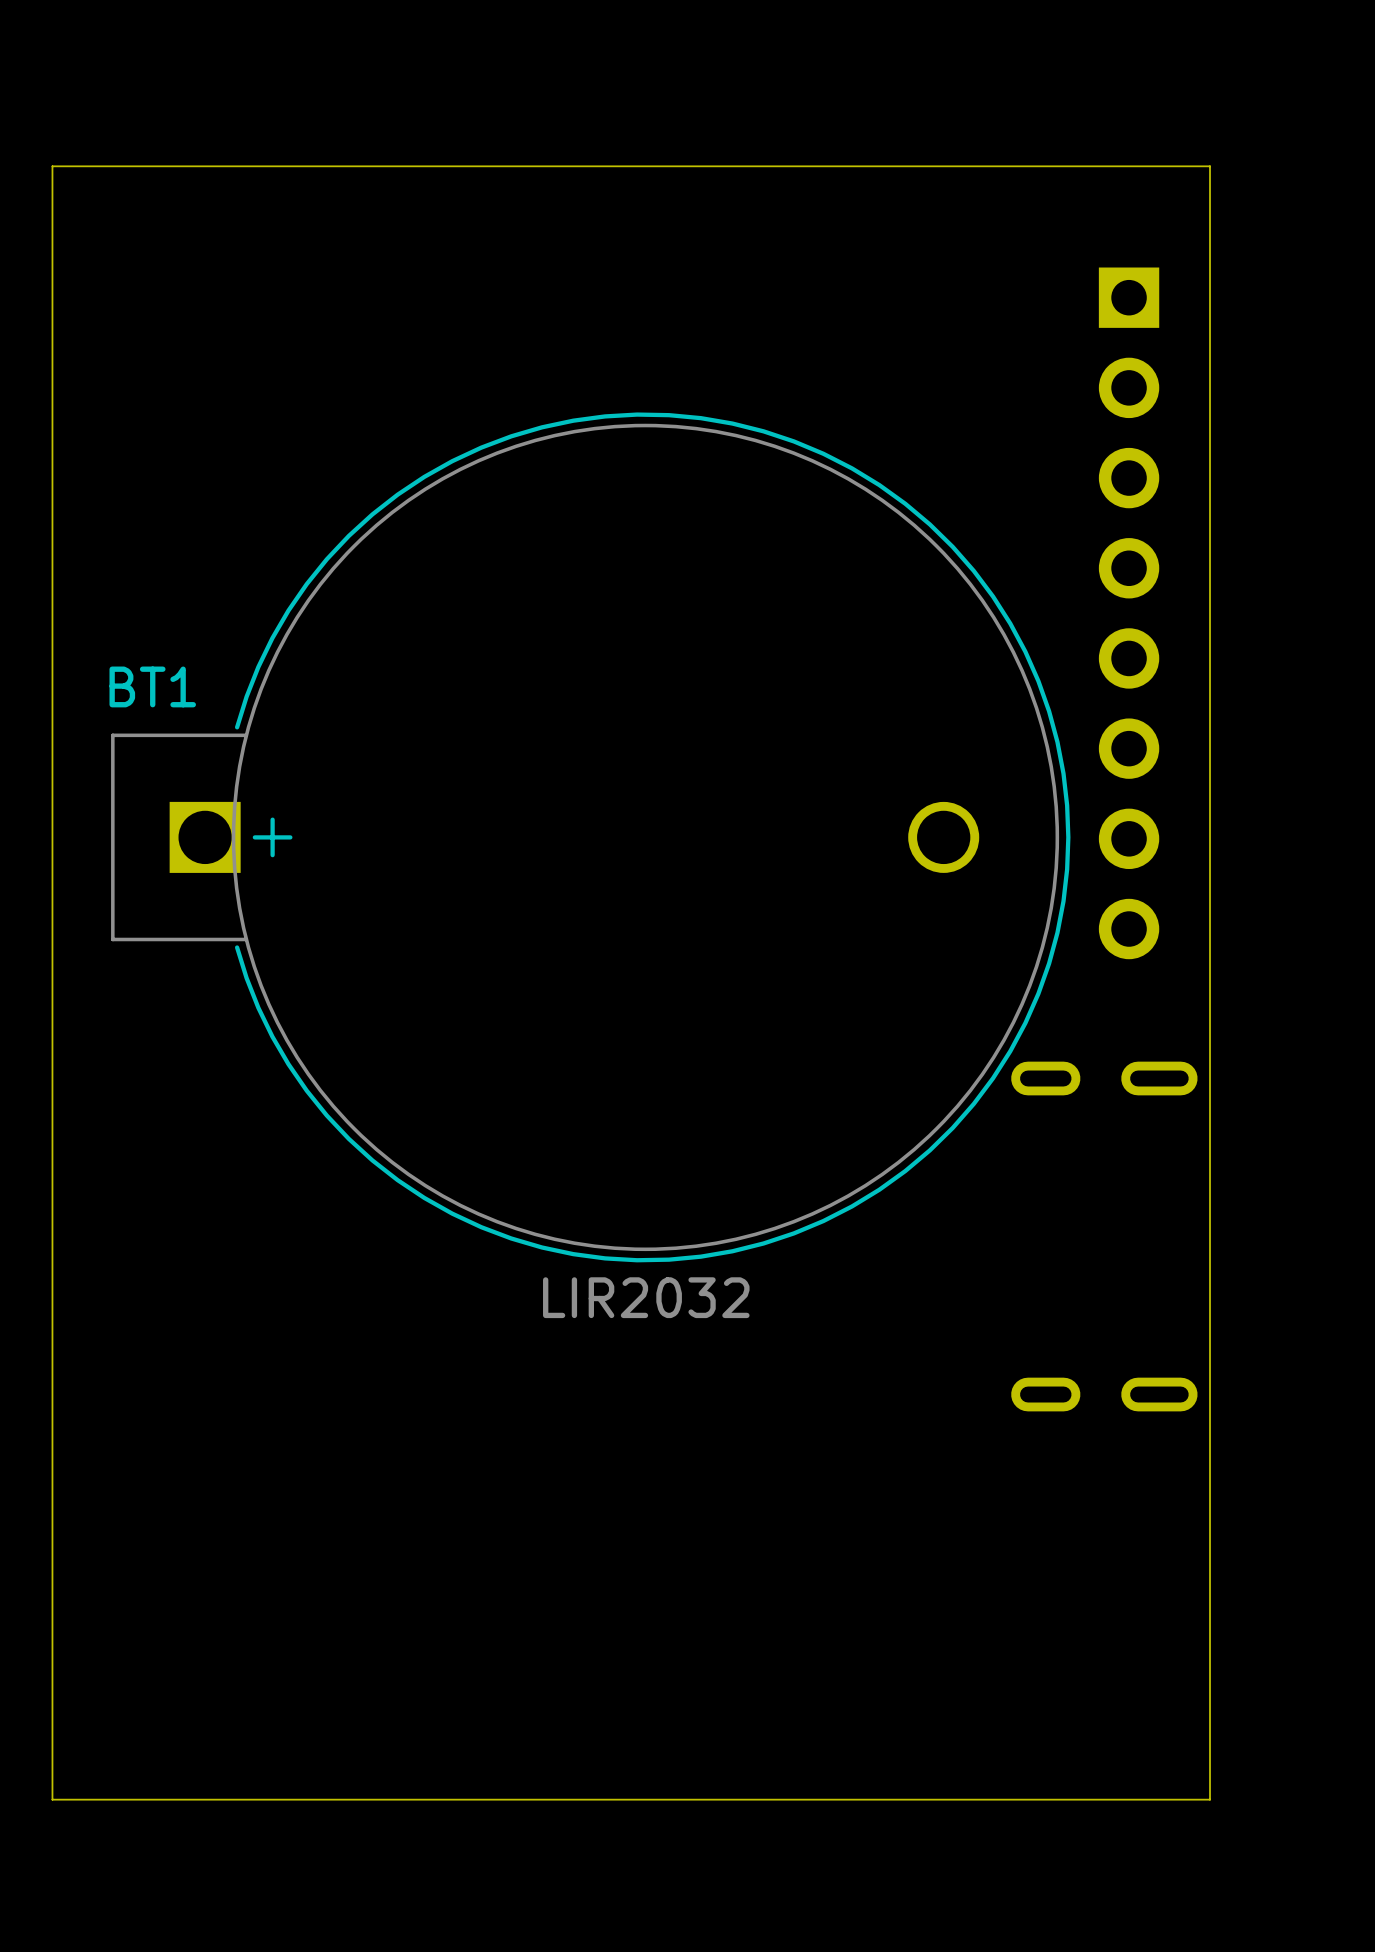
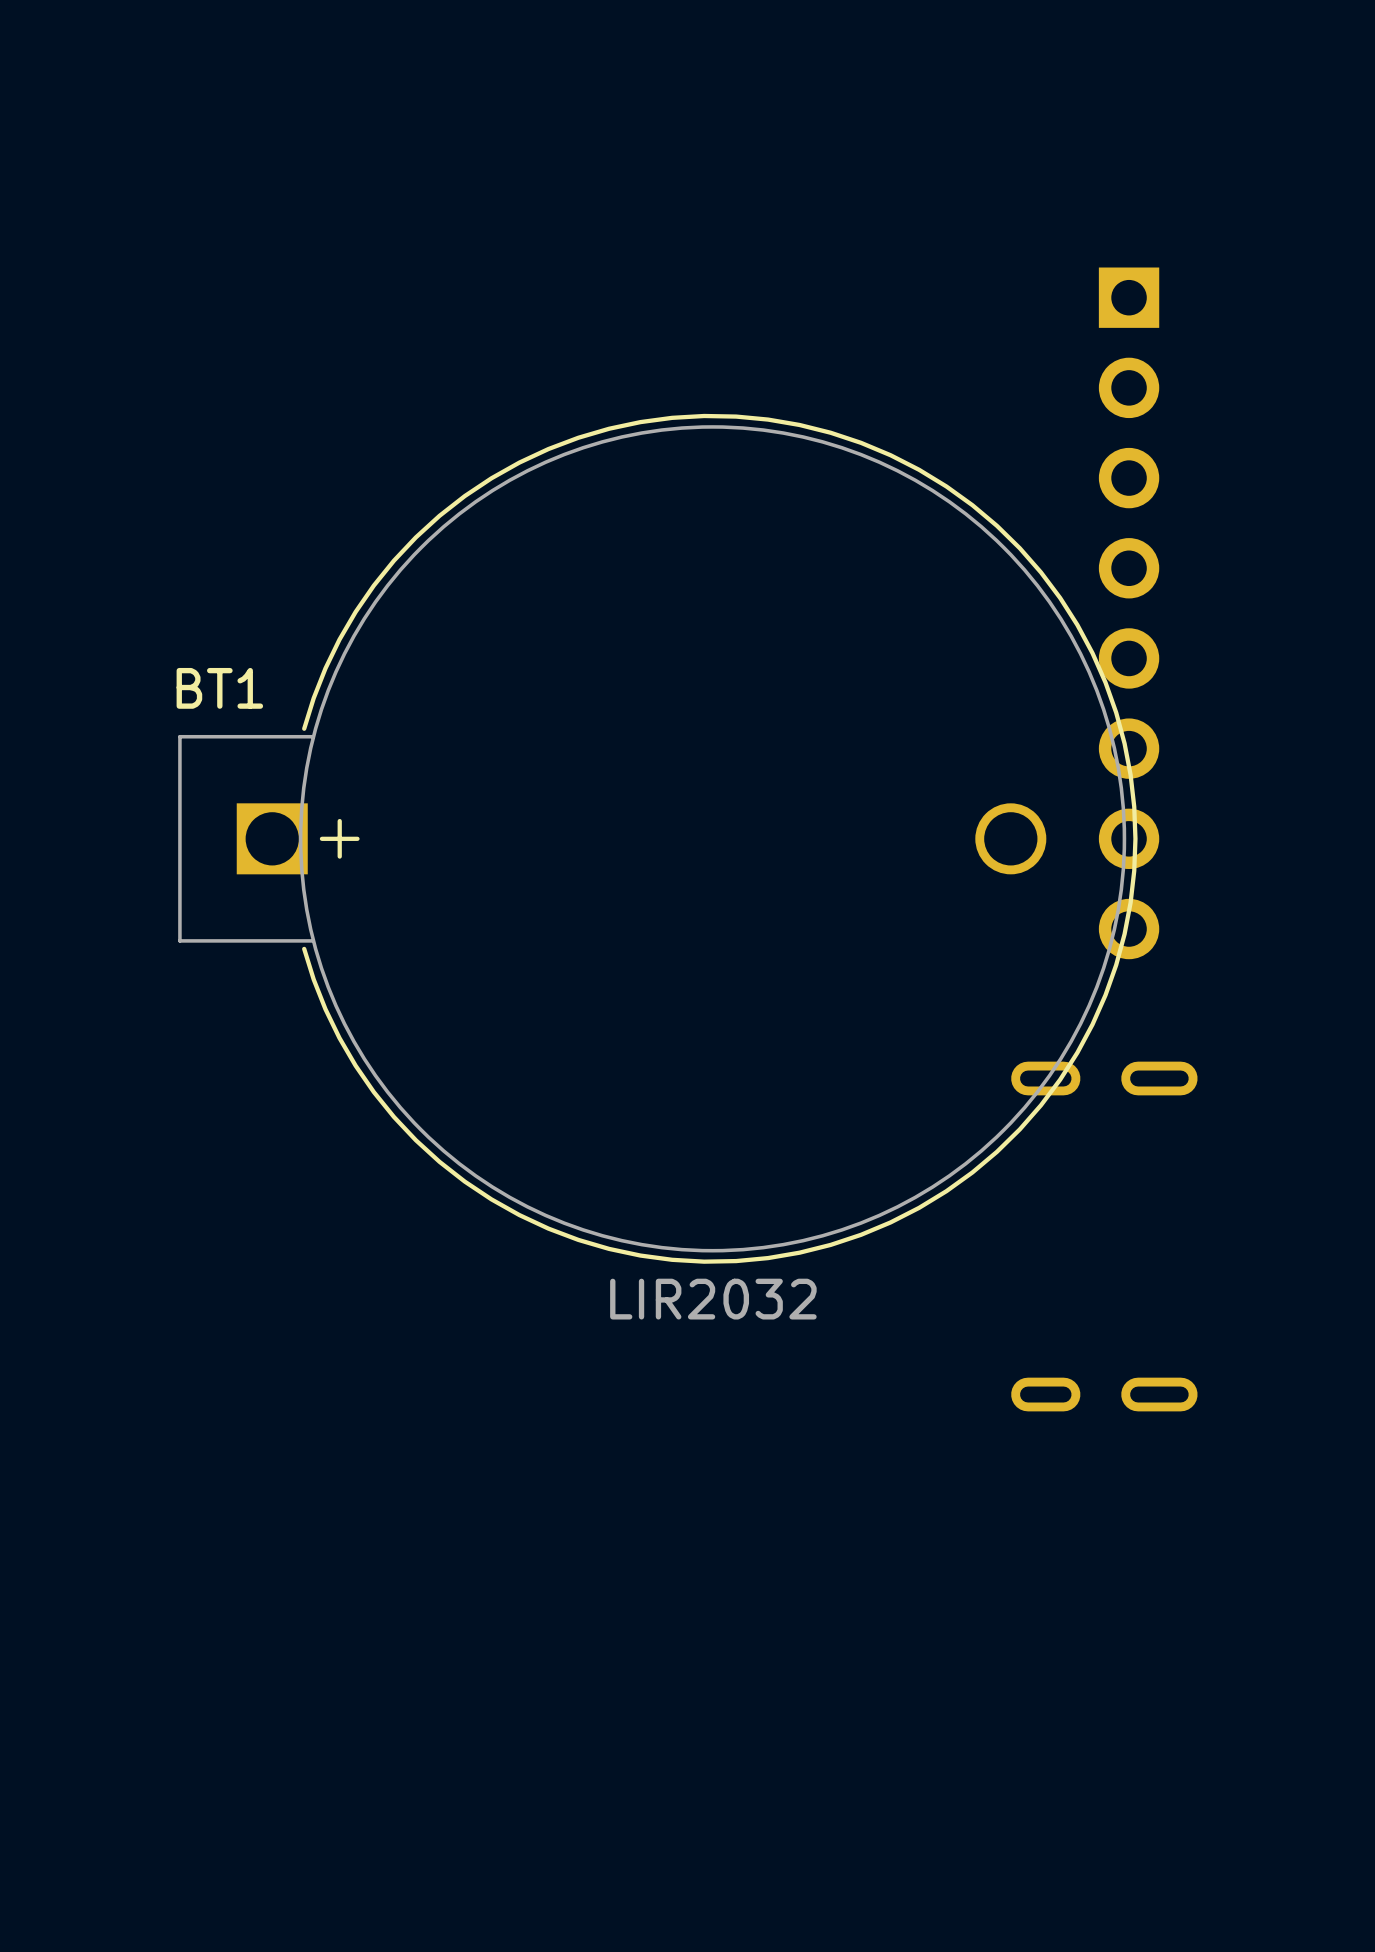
board edge: (1210, 166) (52, 166) (52, 1799) (1210, 1799) (1210, 166) -> none
BT1 position: (590, 837) -> (657, 838)

